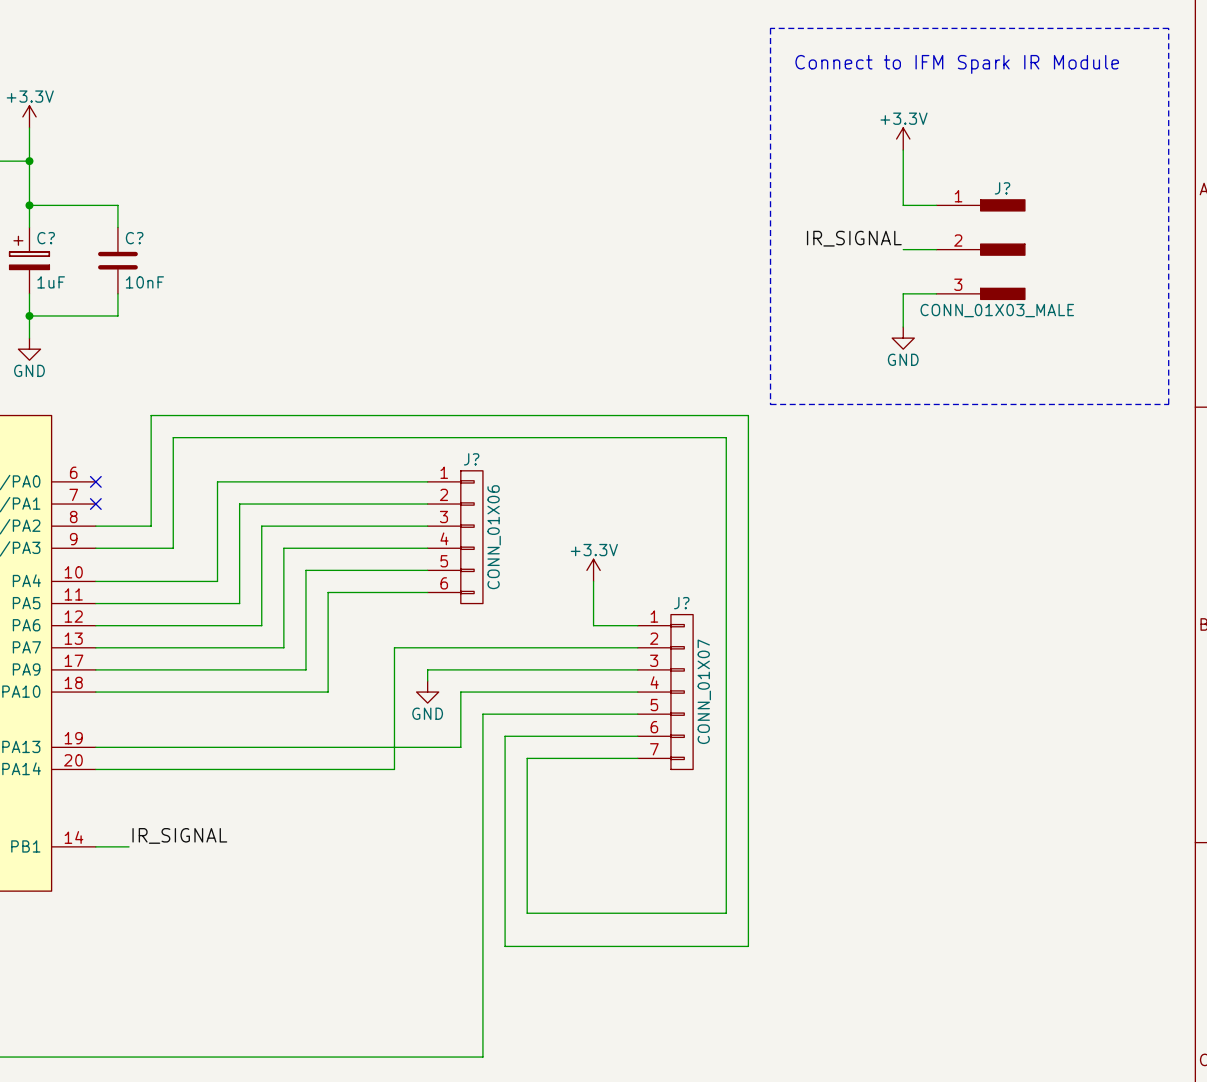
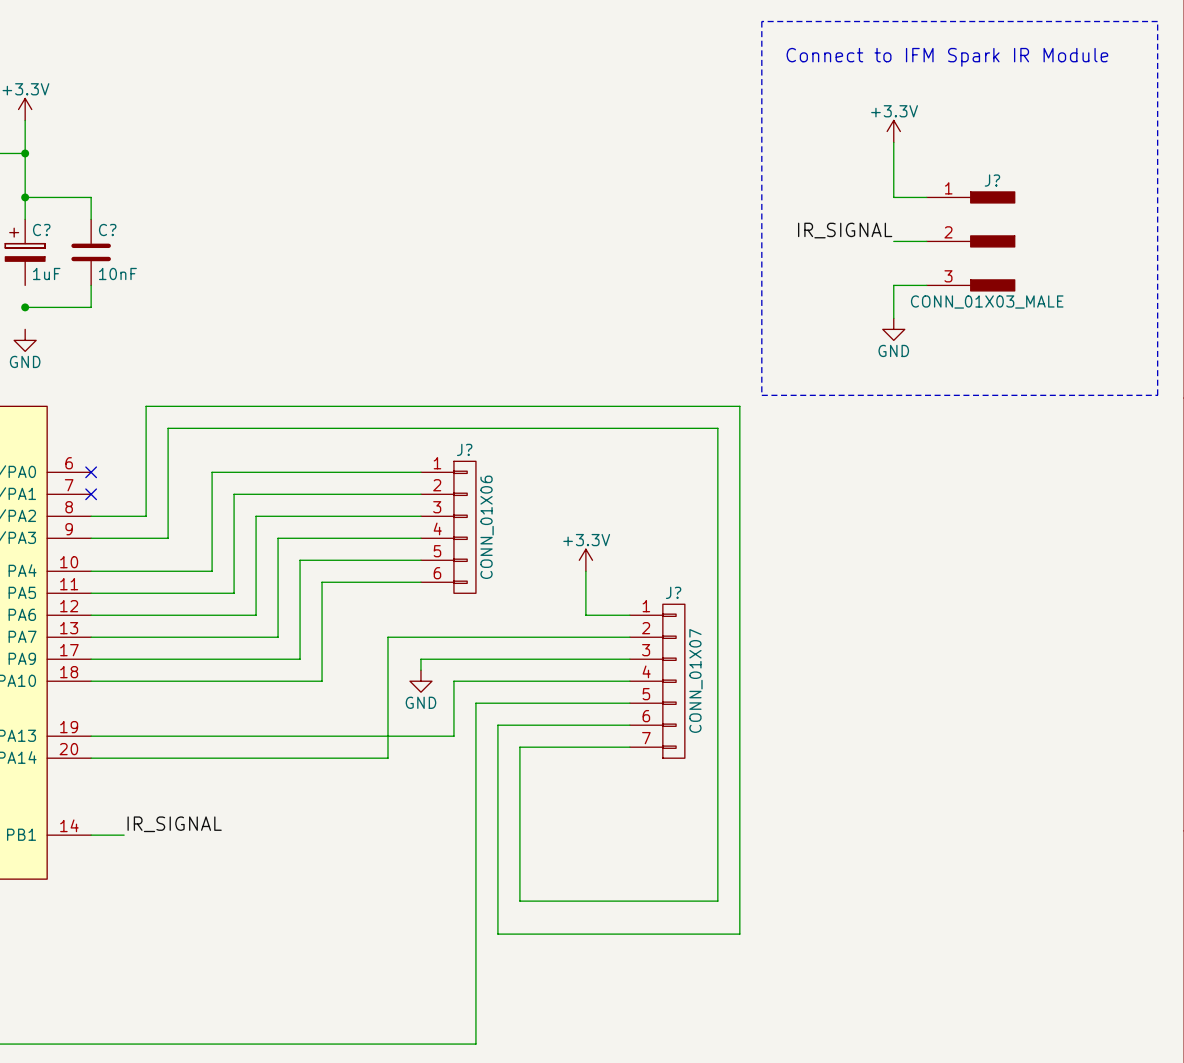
wire: (95, 205) (117, 205) (117, 227) -> (91, 197) (91, 219)
C? position: (117, 260) -> (91, 252)
wire: (29, 293) (29, 338) -> none
wire: (117, 293) (117, 315) (95, 315) -> (91, 285) (91, 307)

